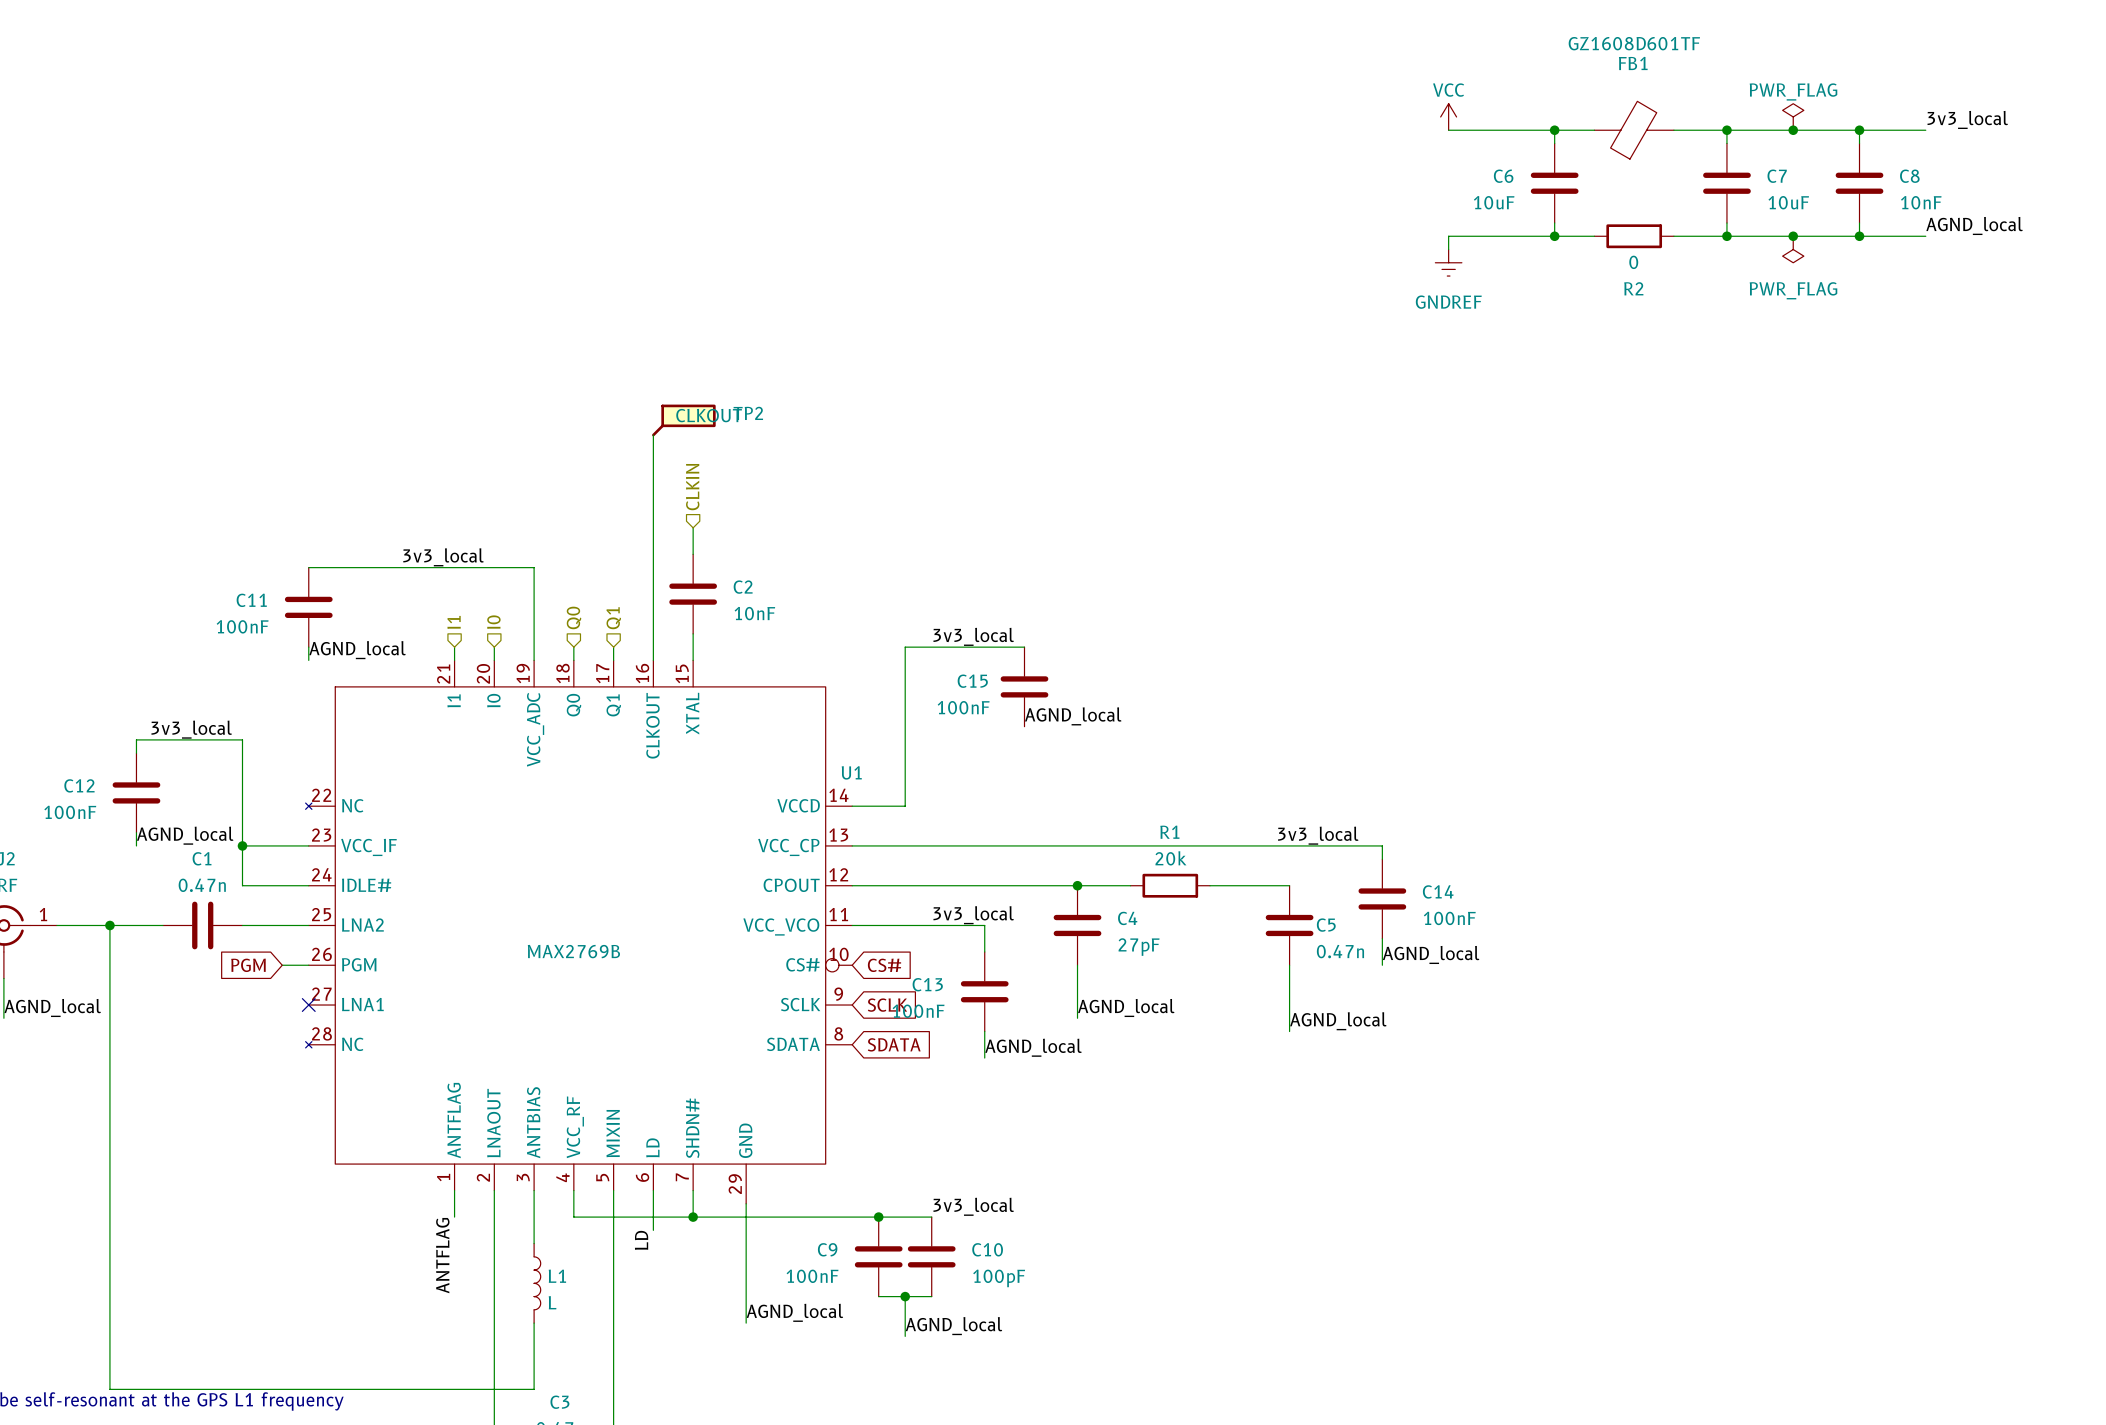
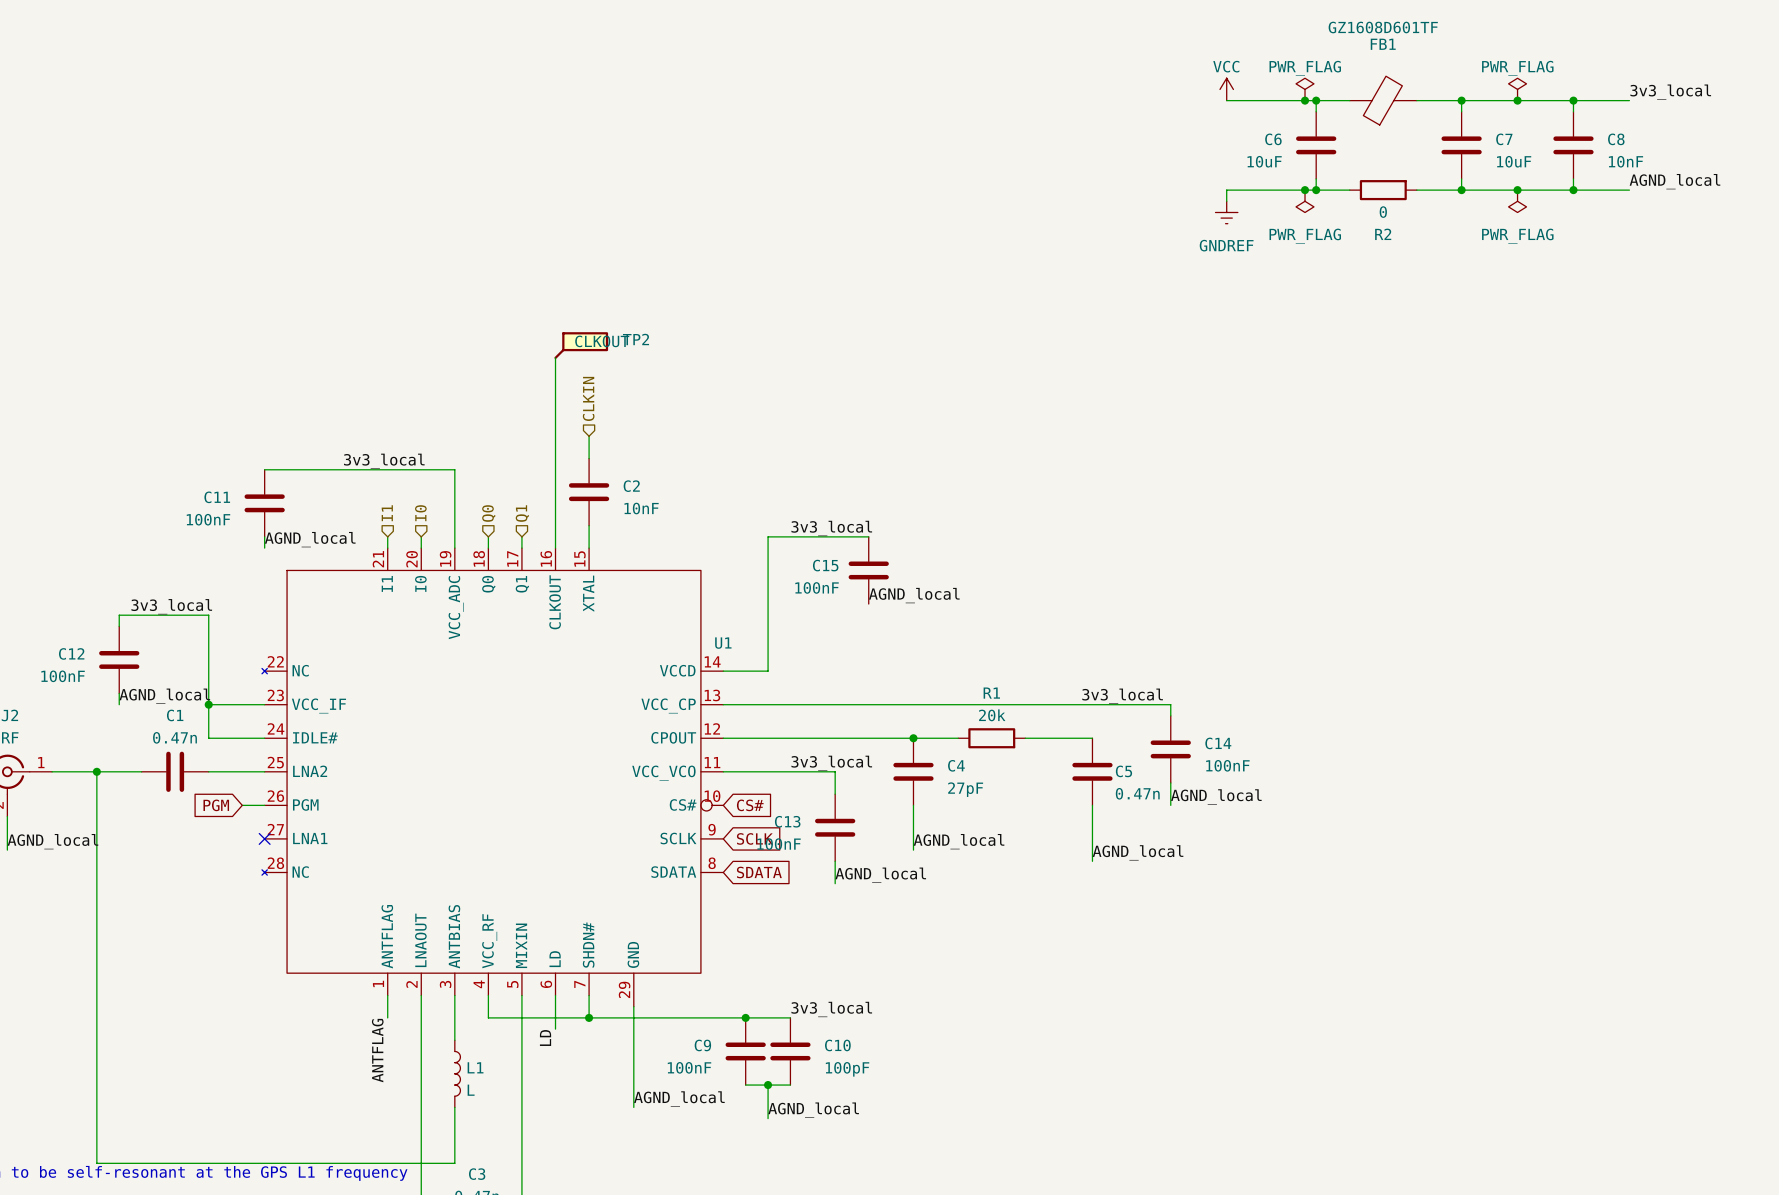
power symbol: none -> PWR_FLAG (1305, 89)
junction: none -> (1305, 100)
junction: none -> (1305, 190)
power symbol: none -> PWR_FLAG (1305, 201)
U1 value: MAX2769B (573, 951) -> none

